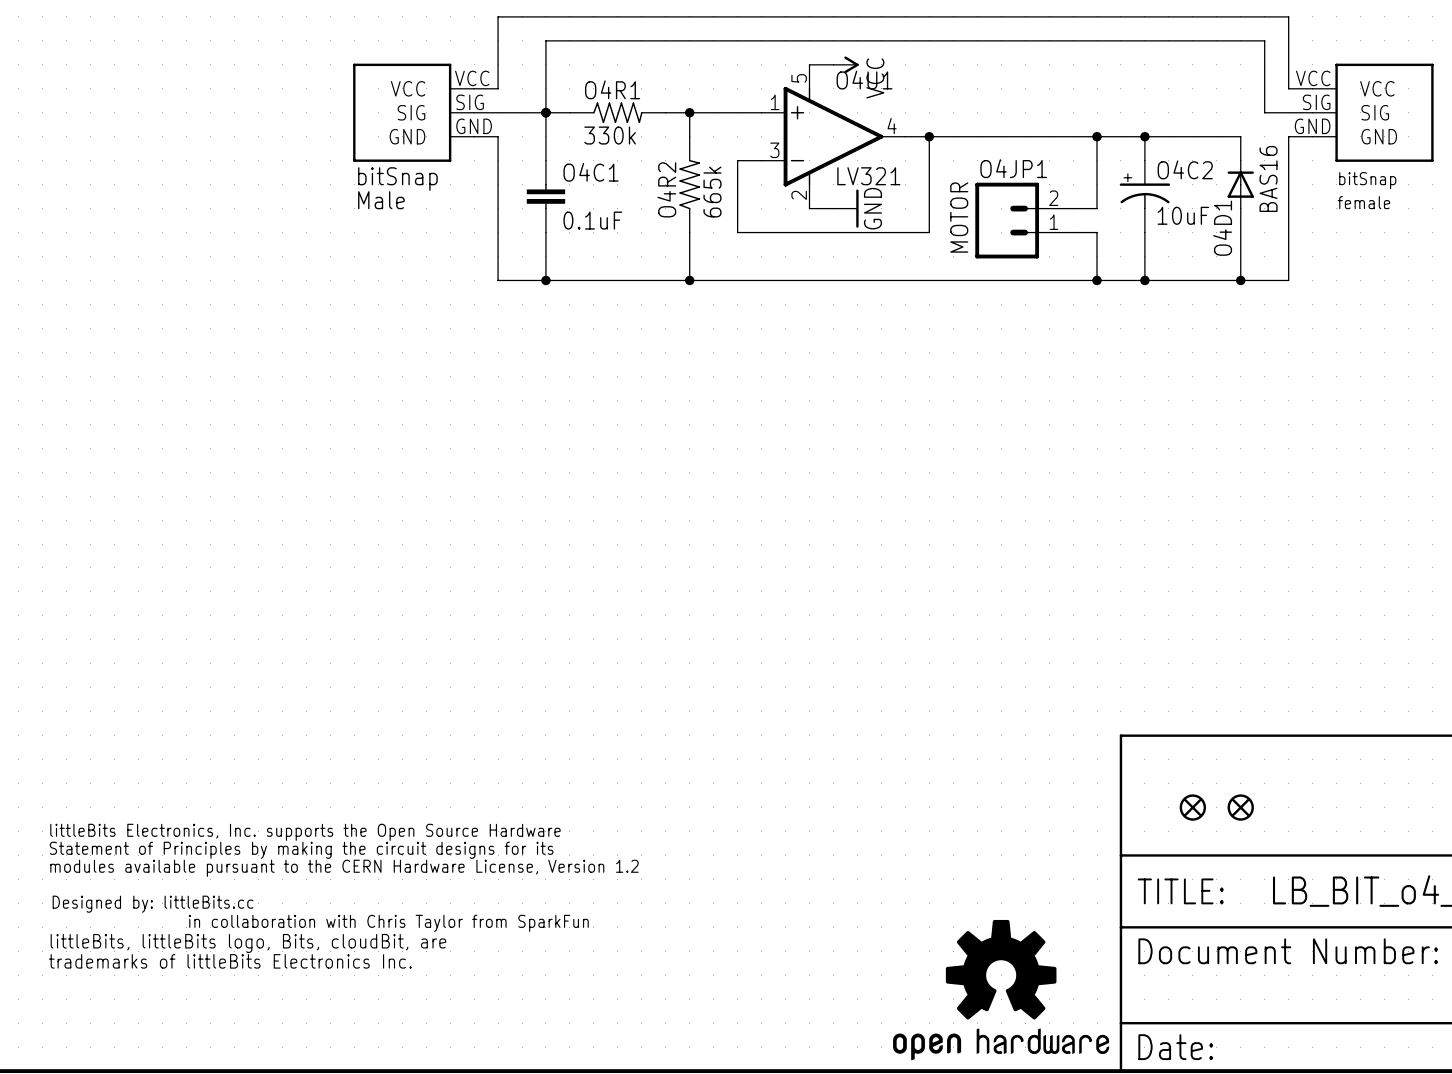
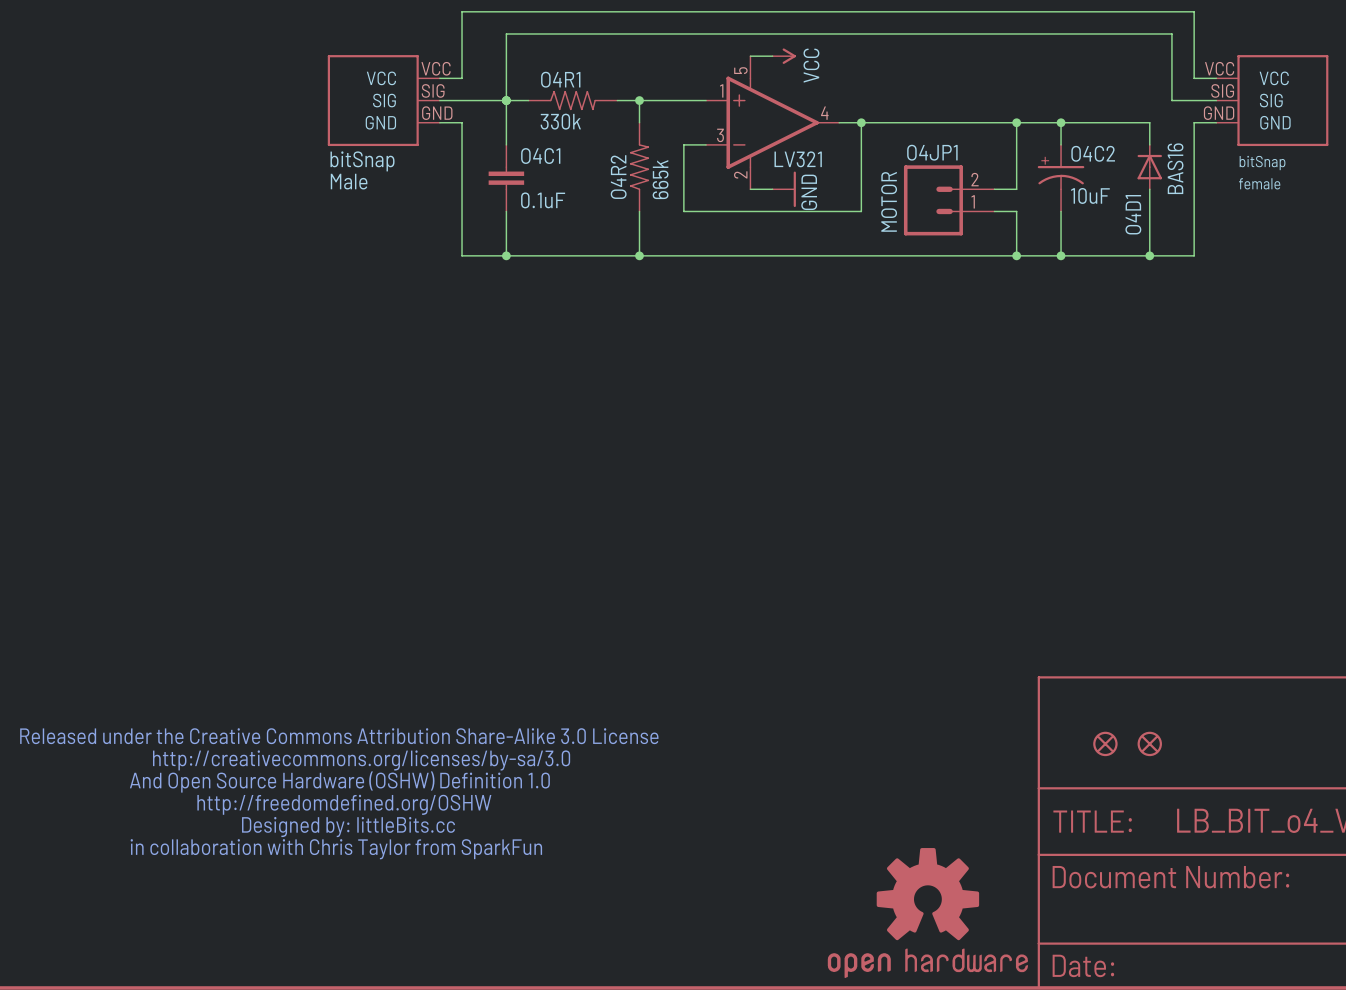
O4U1 name: O4U1 (864, 80) -> none
part: none -> (339, 793)
part: (343, 896) -> none
text: in collaboration with Chris Taylor from SparkFun (388, 923) -> none

